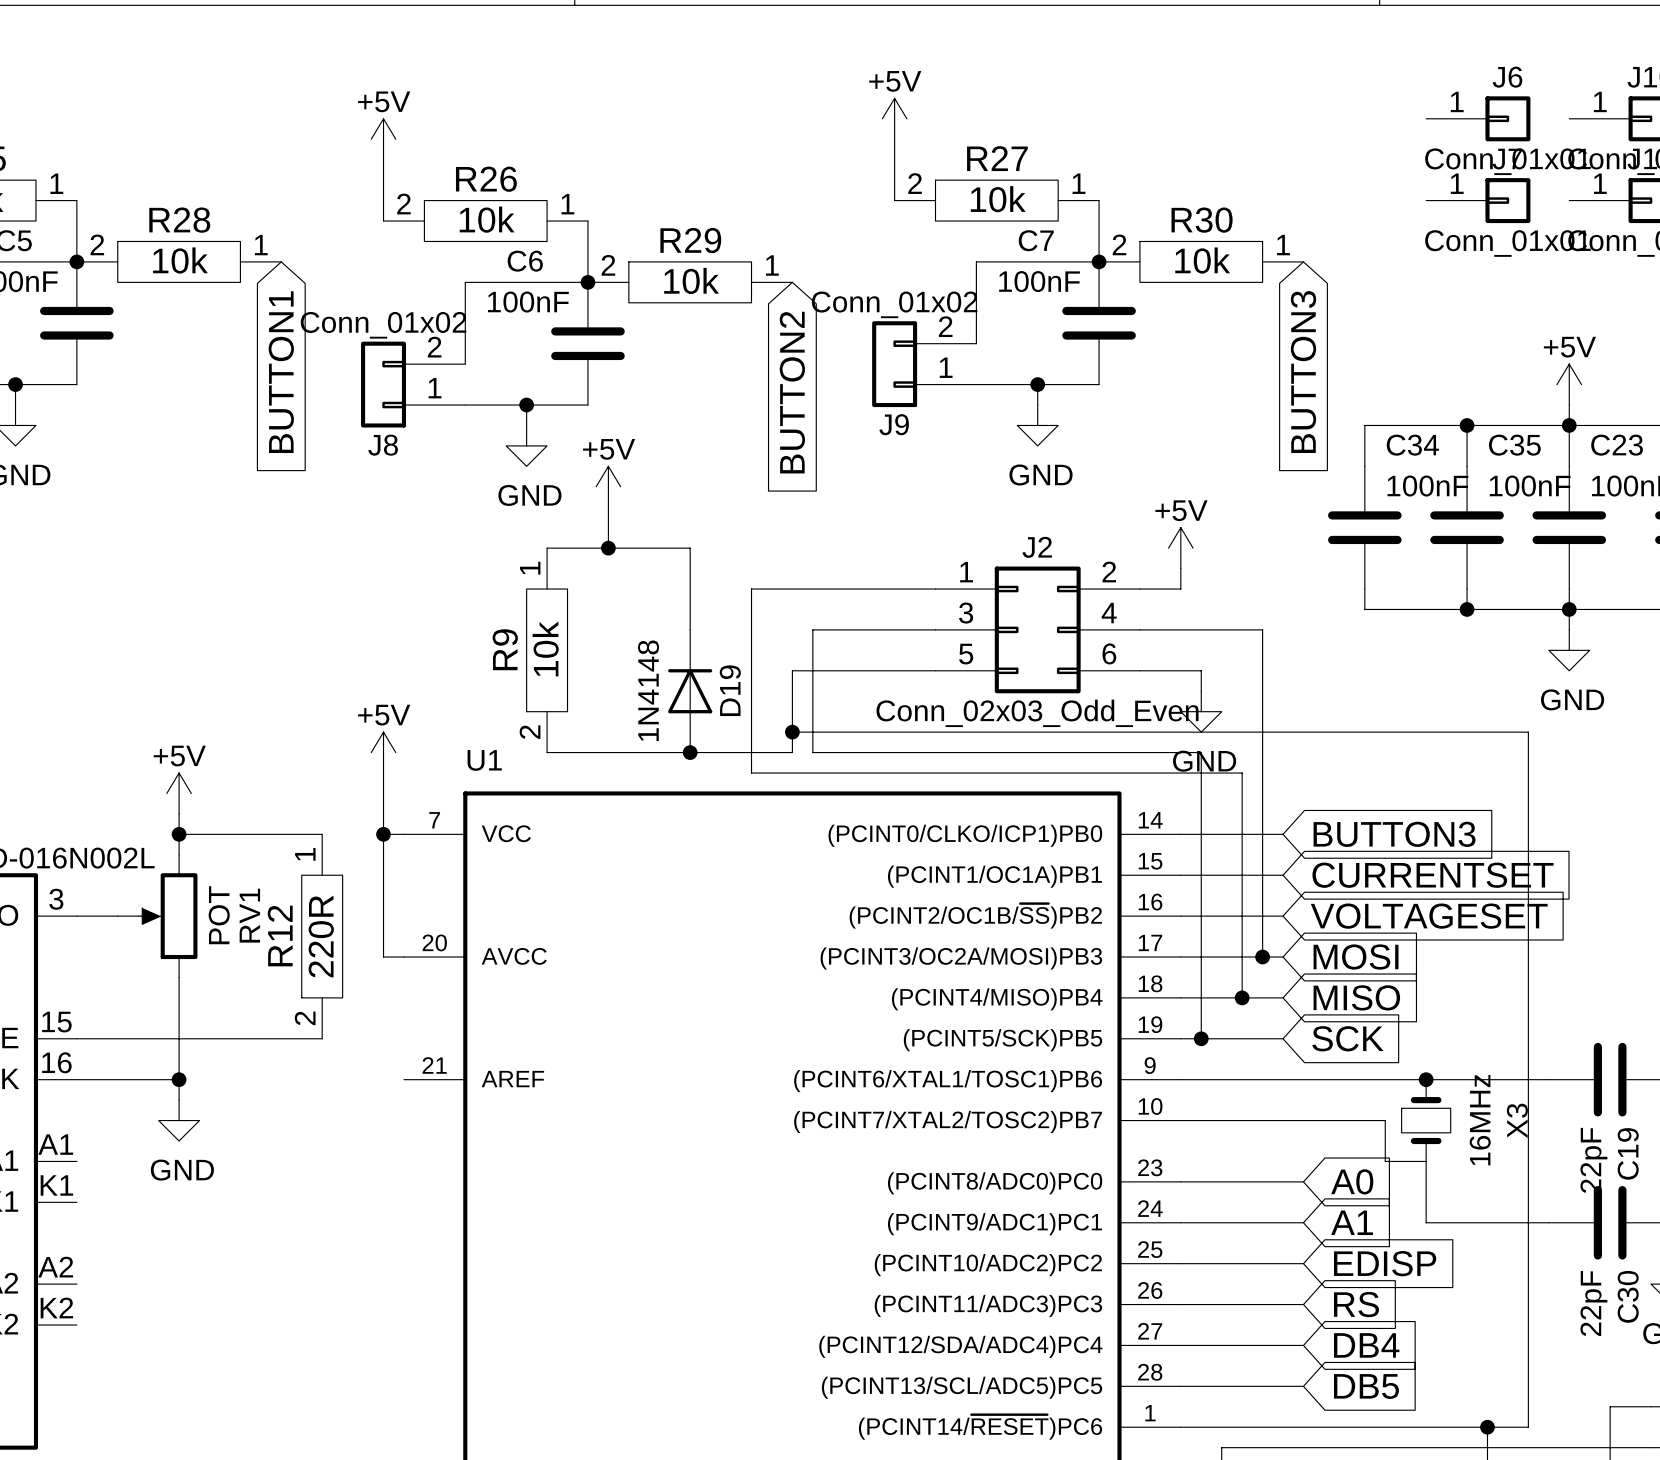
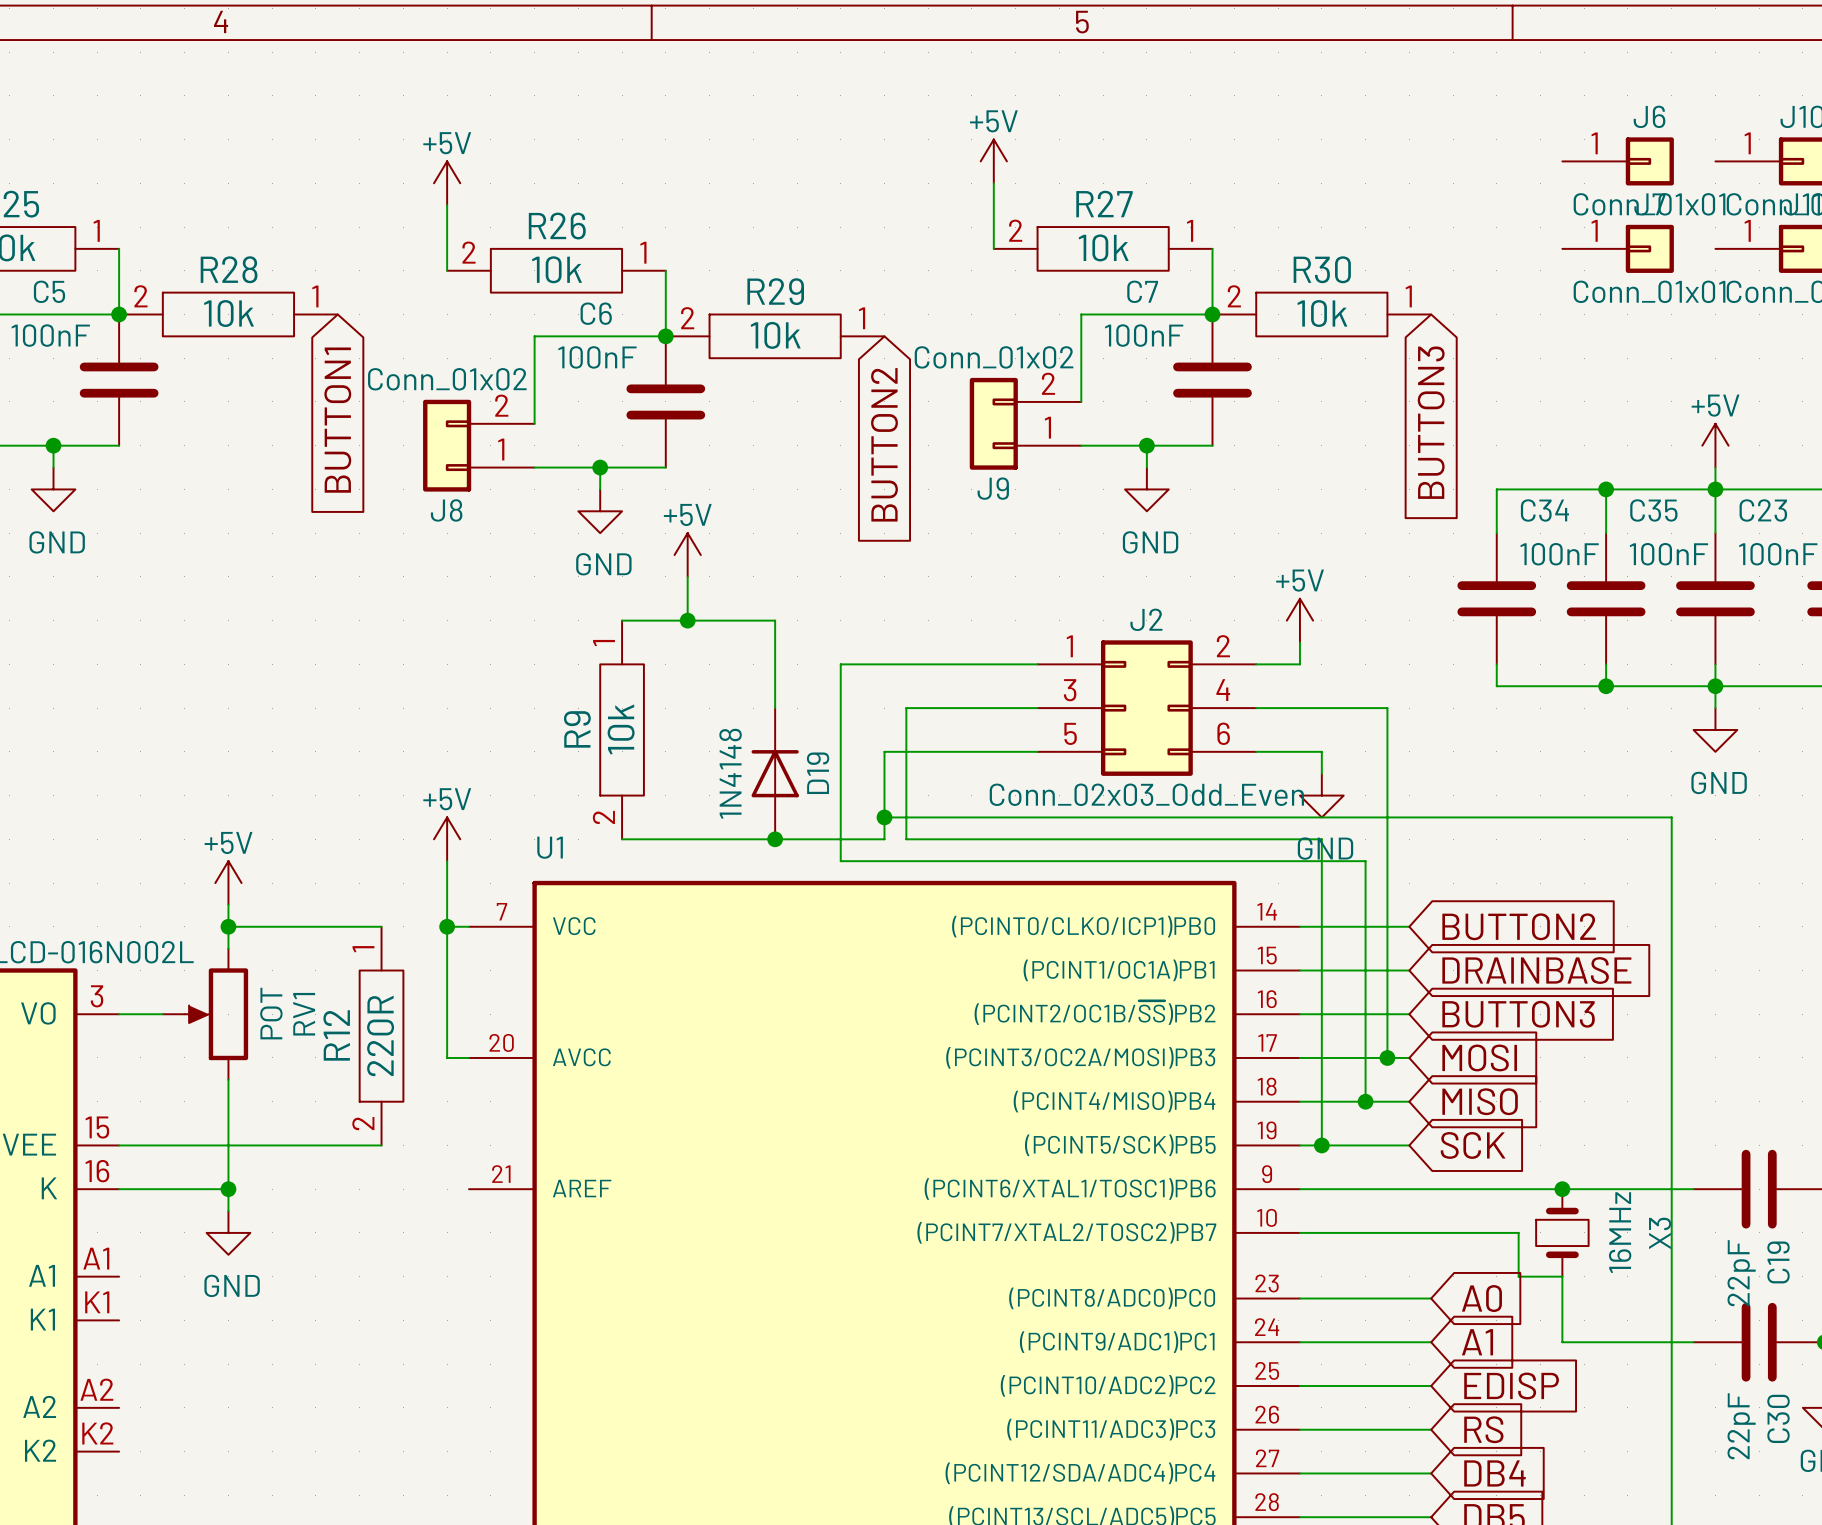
global label: BUTTON3 (1394, 834) -> BUTTON2 (1519, 926)
global label: CURRENTSET (1432, 875) -> DRAINBASE (1536, 970)
global label: VOLTAGESET (1429, 916) -> BUTTON3 (1518, 1014)

